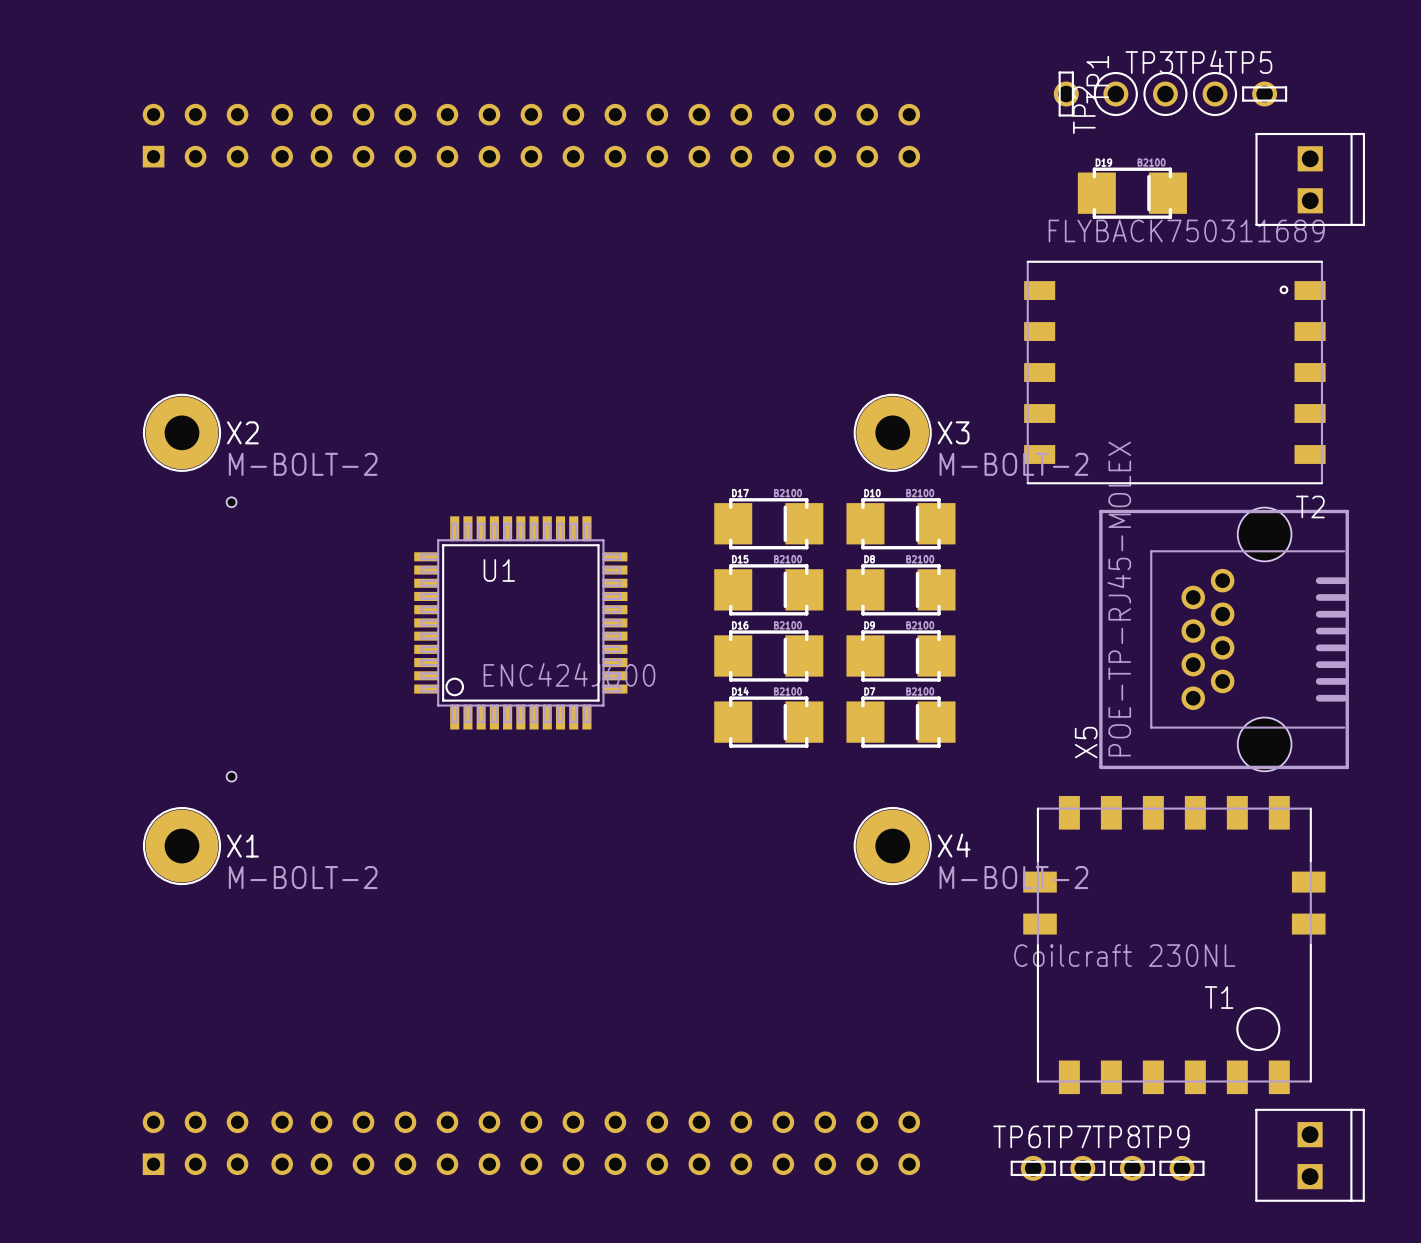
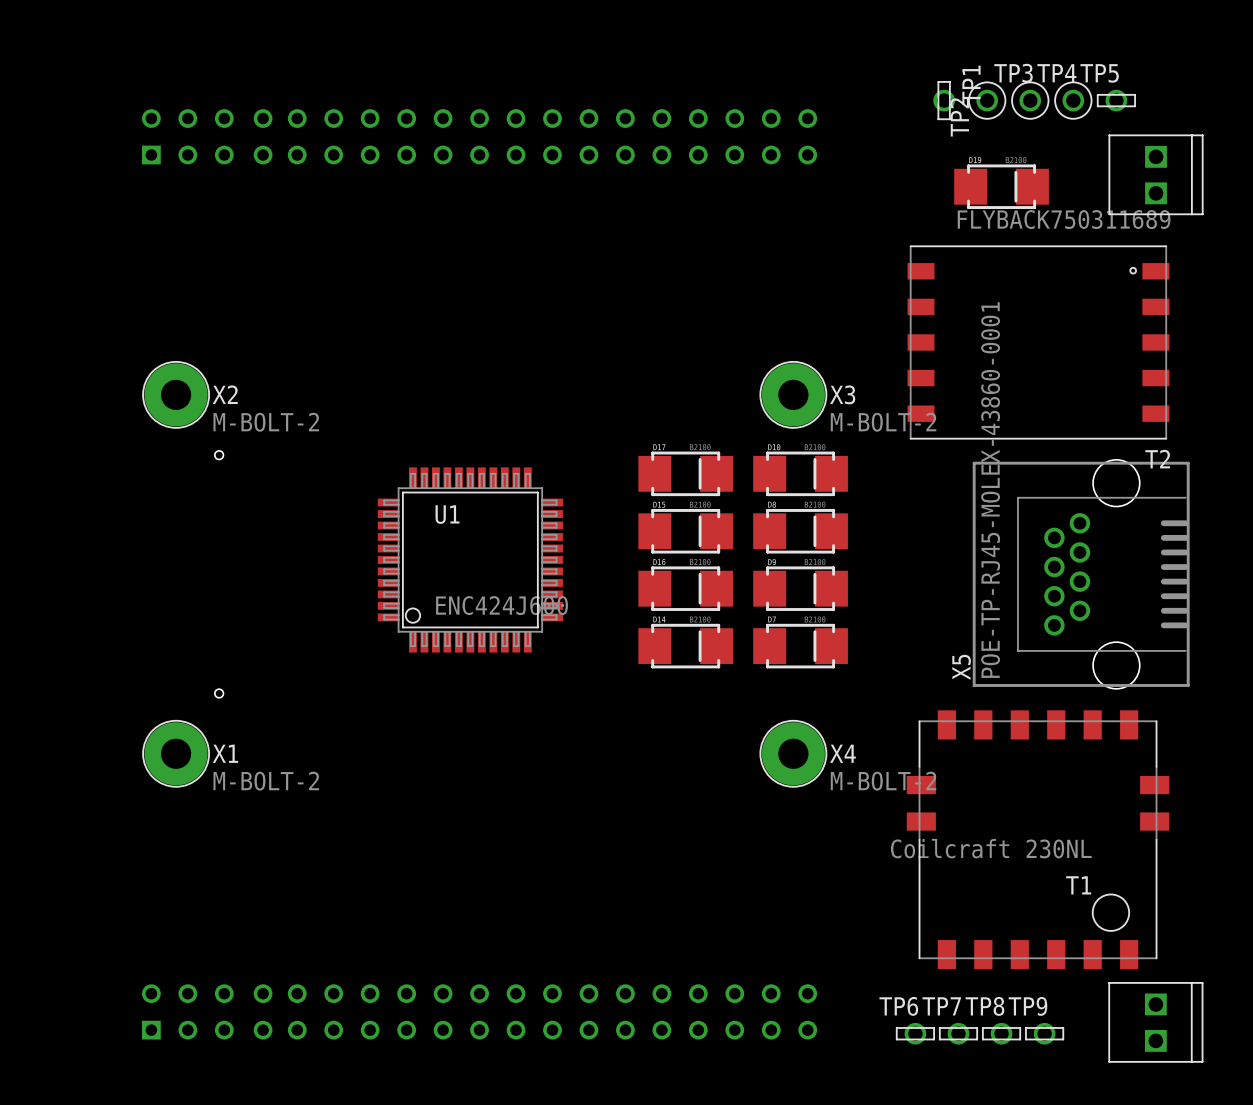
X5 value: POE-TP-RJ45-MOLEX (1119, 599) -> POE-TP-RJ45-MOLEX-43860-0001 (990, 490)

